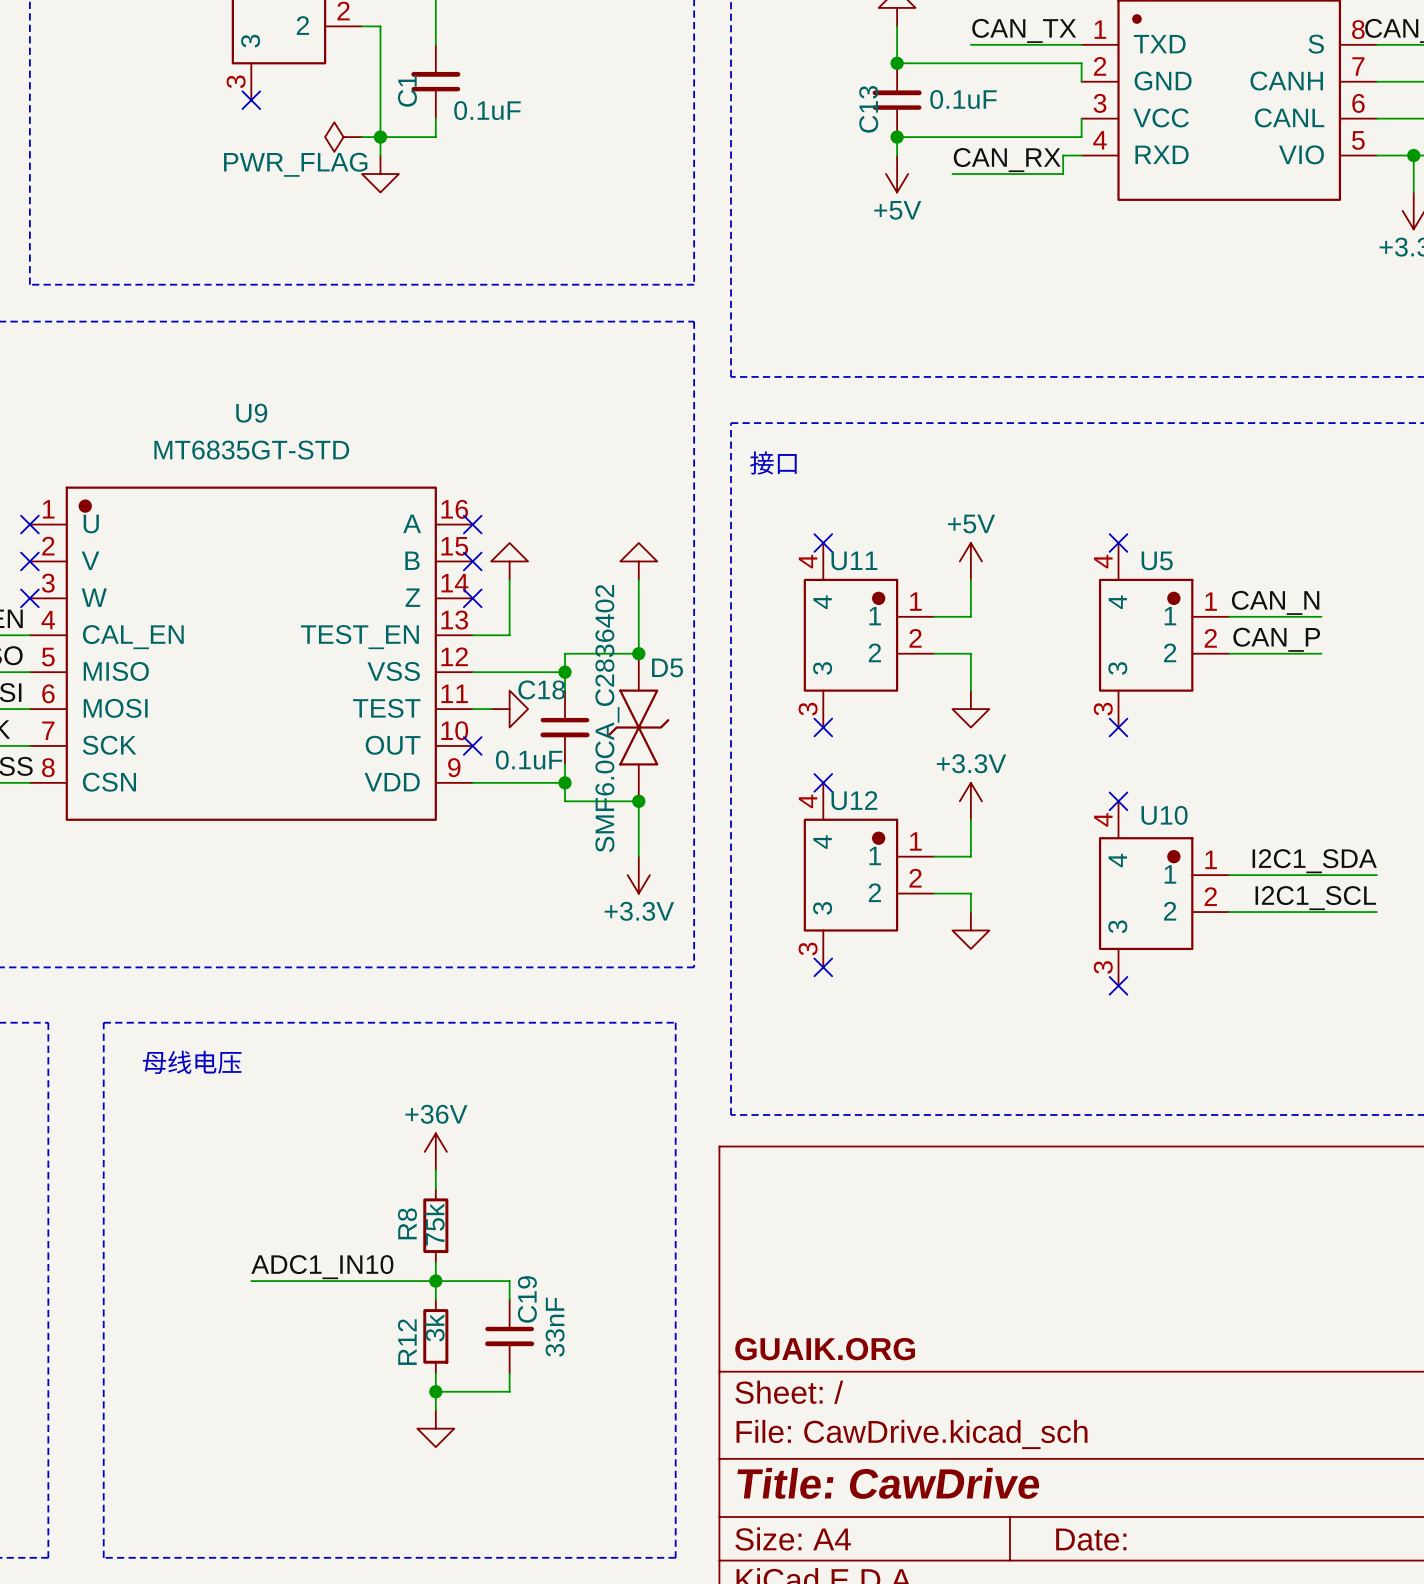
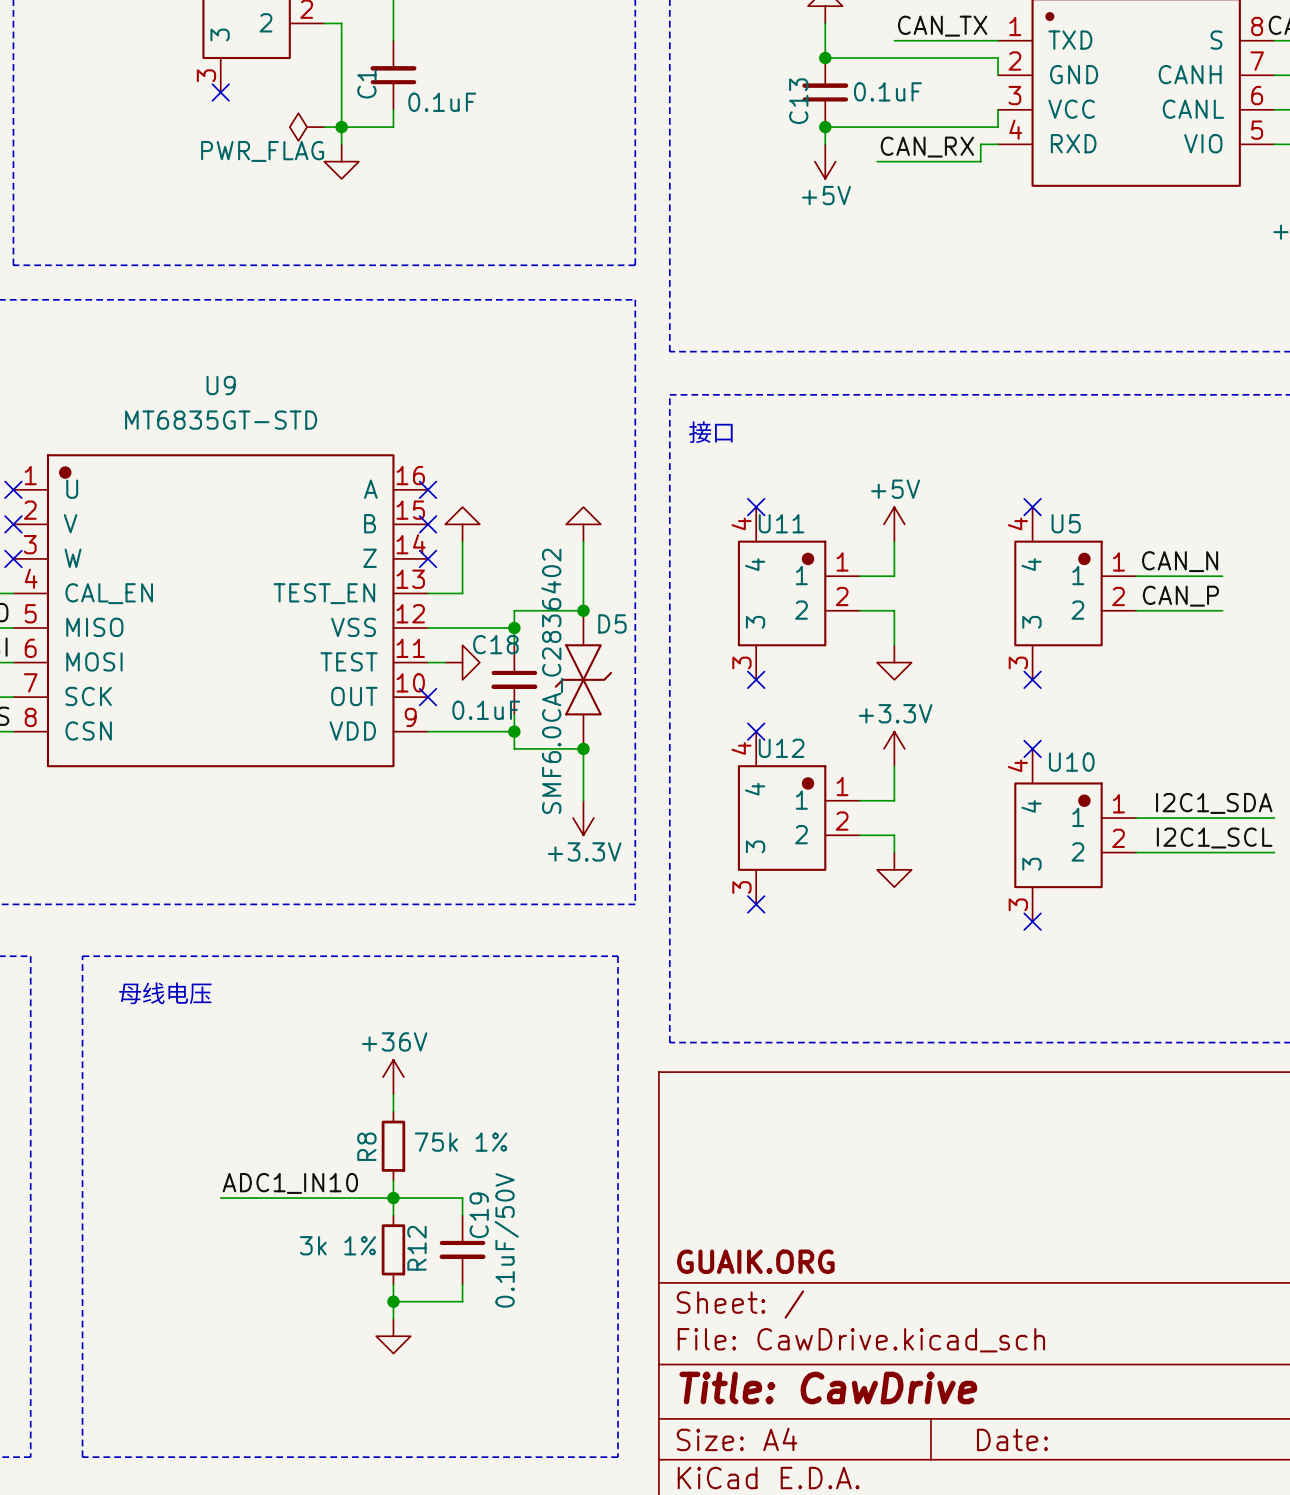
R8 value: 75k (434, 1224) -> 75k 1% (461, 1142)
R12 value: 3k (434, 1327) -> 3k 1% (337, 1245)
C19 value: 33nF (555, 1327) -> 0.1uF/50V (506, 1240)
R12 name position: R12 (407, 1342) -> R12 (416, 1248)

